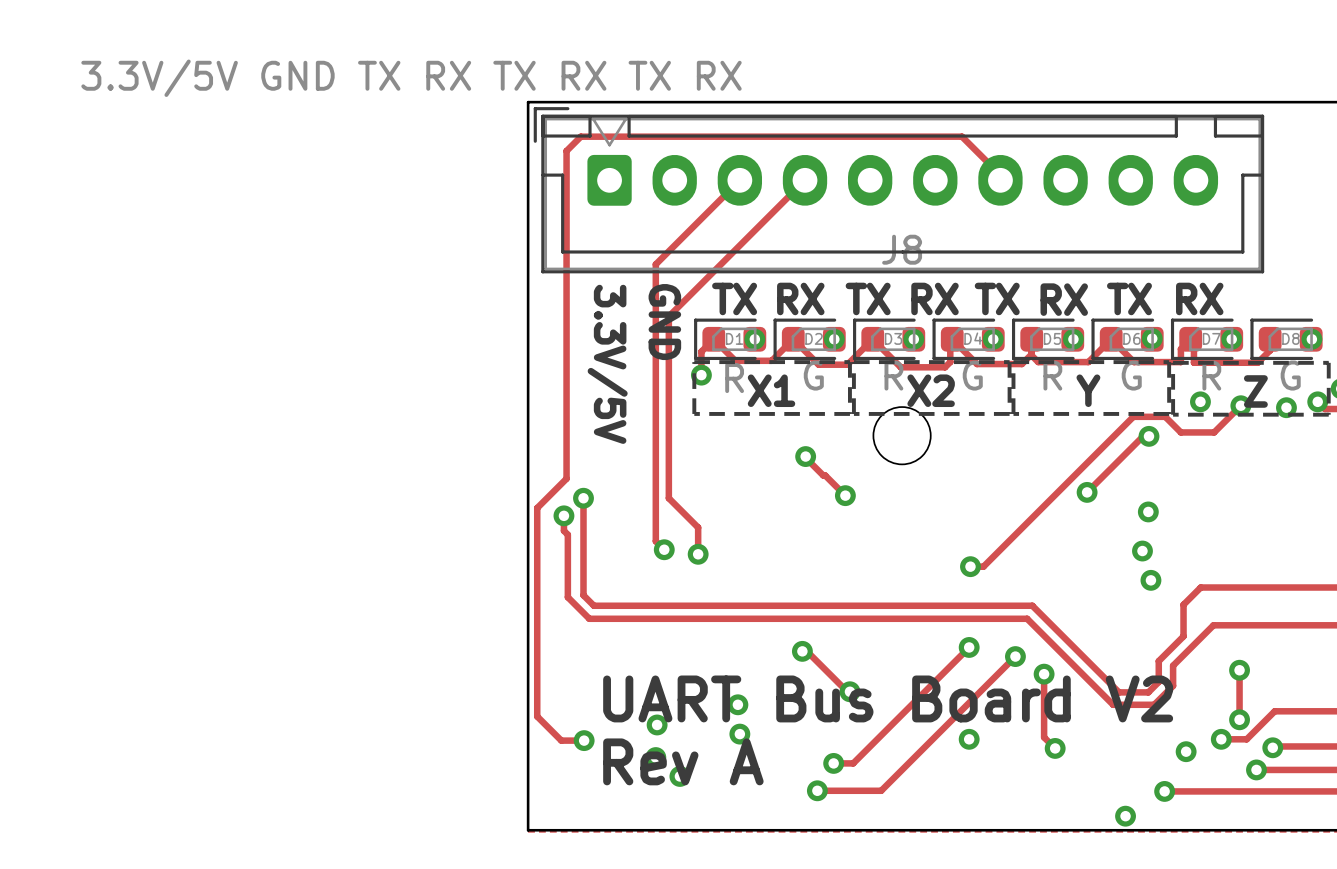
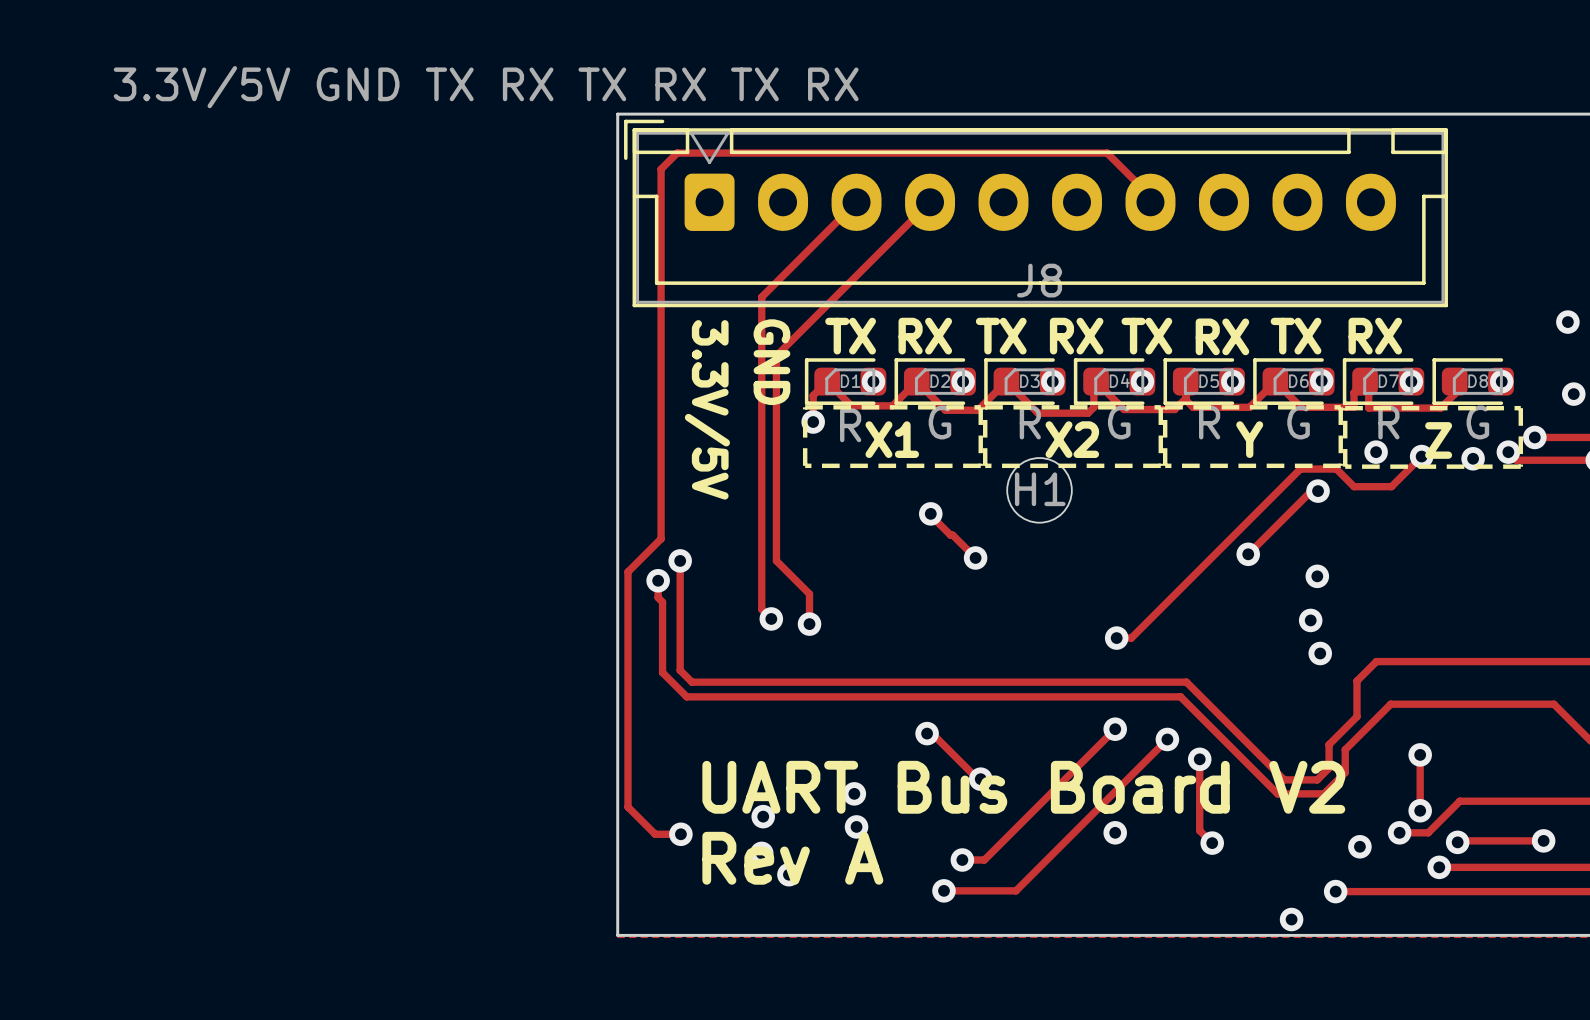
H1 name: none -> H1 (1040, 489)

